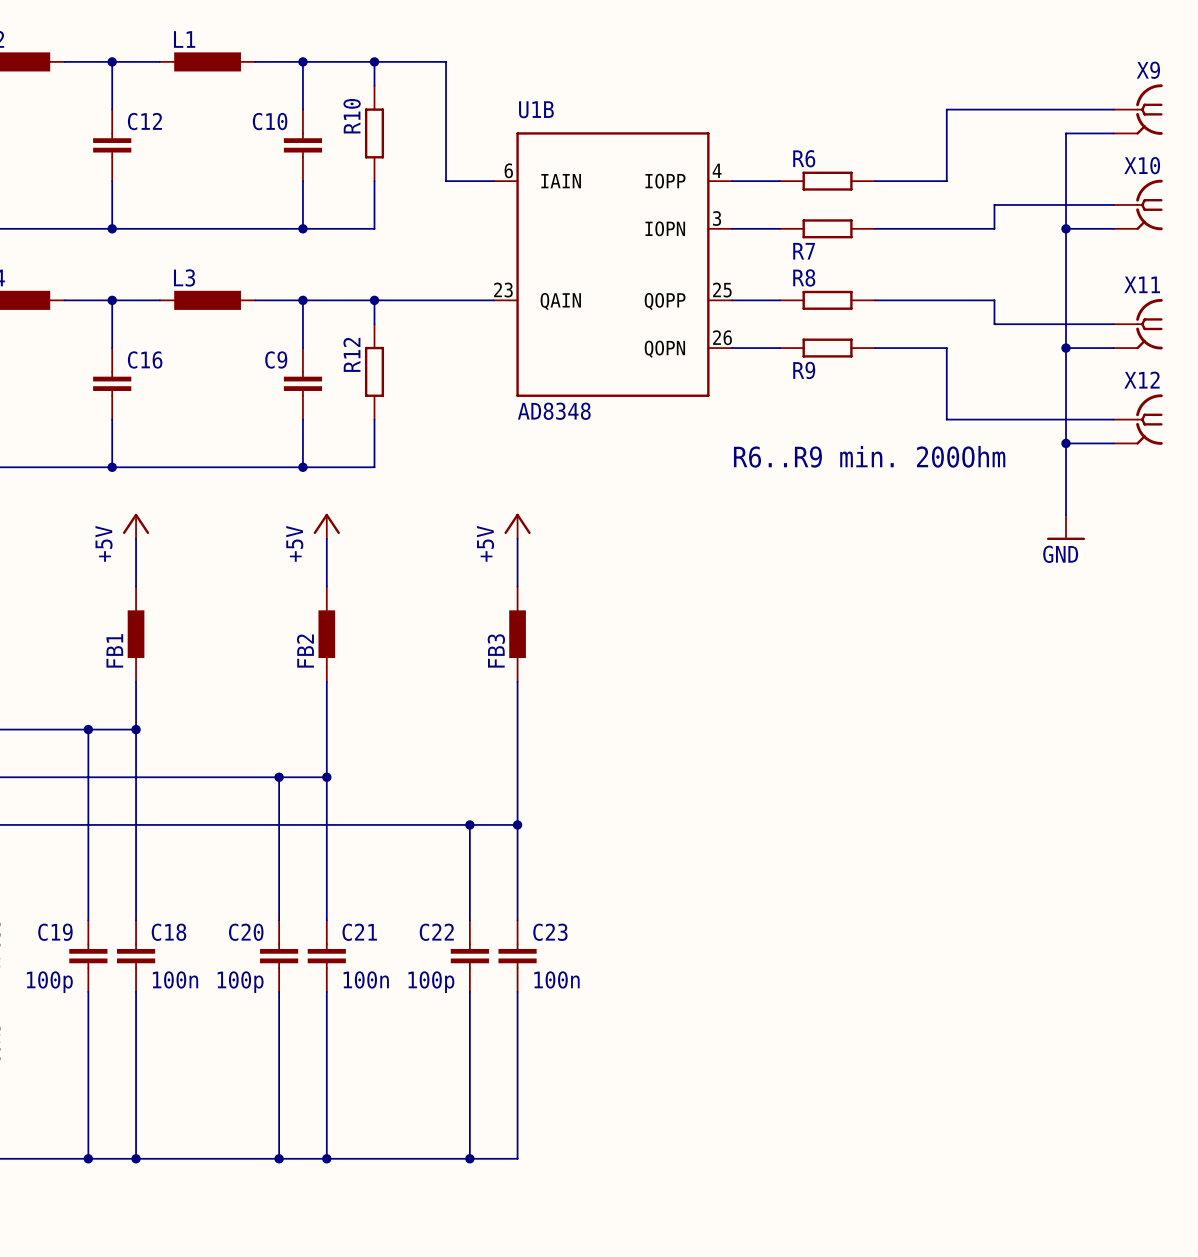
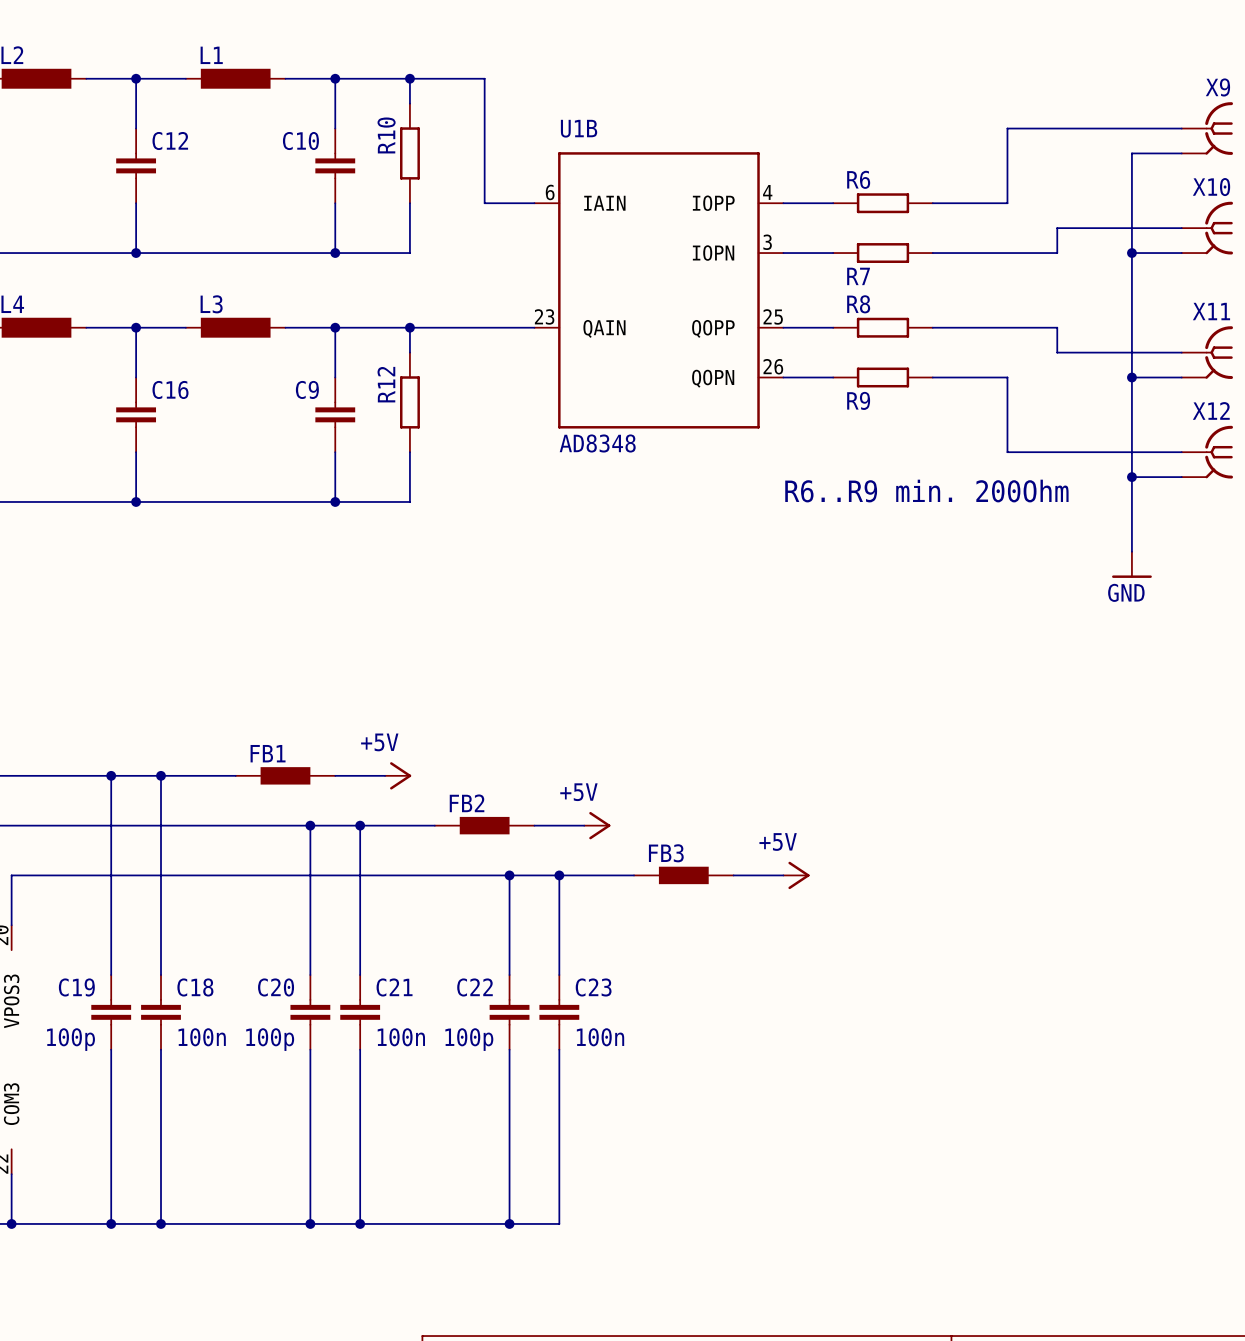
power symbol: +5V (136, 526) -> none
power symbol: +5V (326, 526) -> none
power symbol: +5V (517, 526) -> none
wire: (136, 538) (136, 586) -> none
wire: (326, 538) (326, 586) -> none
wire: (517, 538) (517, 586) -> none
FB1 rotation: 0° (136, 634) -> 90° clockwise (285, 775)
FB1 position: (136, 634) -> (285, 775)
FB2 rotation: 0° (326, 634) -> 90° clockwise (484, 825)
FB2 position: (326, 634) -> (484, 825)
FB3 rotation: 0° (517, 634) -> 90° clockwise (683, 875)
FB3 position: (517, 634) -> (683, 875)
wire: (136, 681) (136, 729) -> (235, 775) (161, 775)
wire: (326, 681) (326, 777) -> (434, 825) (360, 825)
wire: (517, 681) (517, 824) -> (634, 875) (559, 875)
wire: none -> (335, 775) (385, 775)
power symbol: none -> +5V (398, 775)
wire: none -> (534, 825) (584, 825)
power symbol: none -> +5V (597, 825)
wire: none -> (733, 875) (783, 875)
power symbol: none -> +5V (796, 875)

